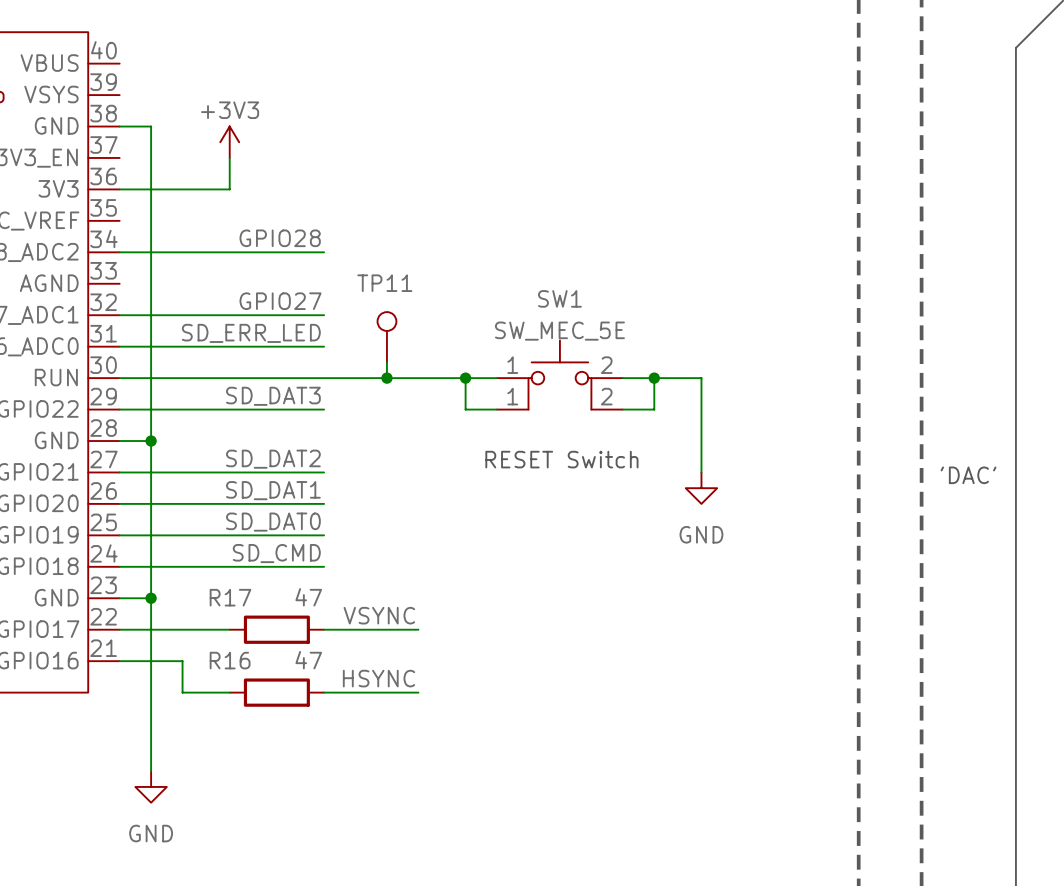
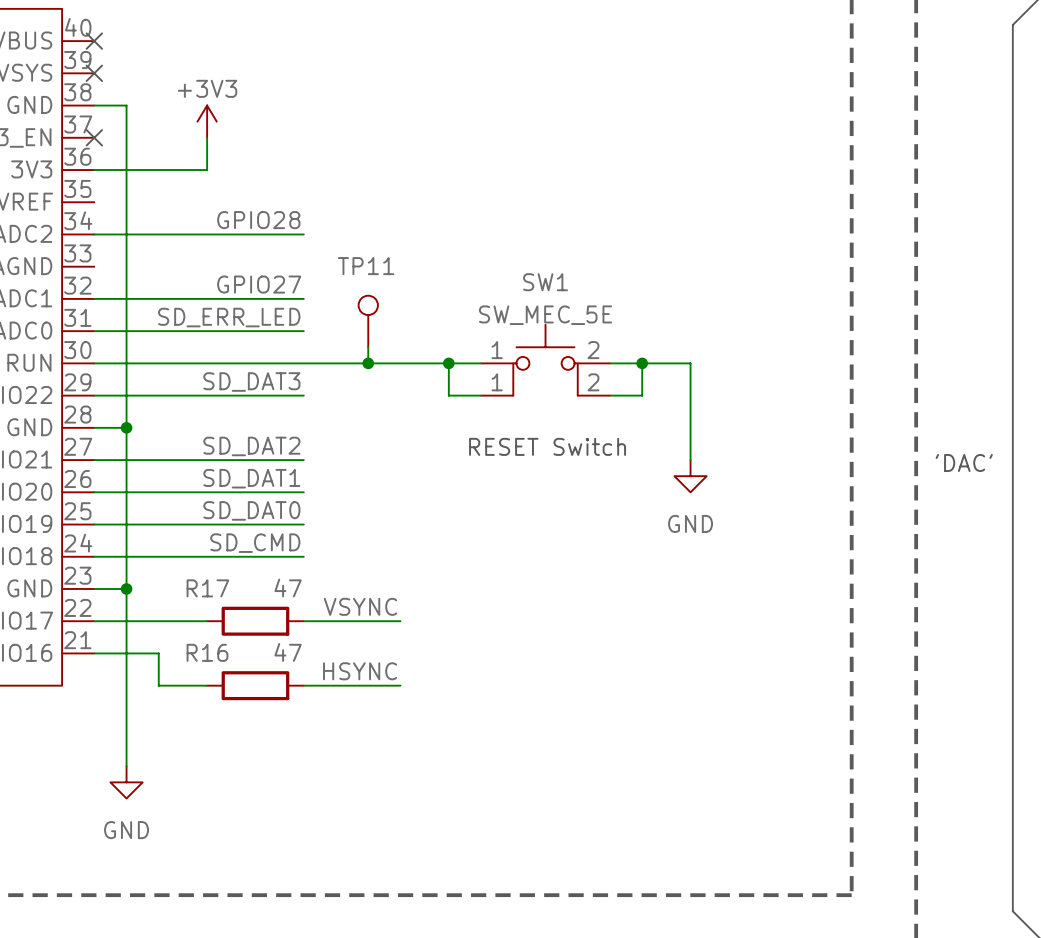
no-connect mark: none -> (94, 41)
no-connect mark: none -> (94, 73)
no-connect mark: none -> (94, 137)

